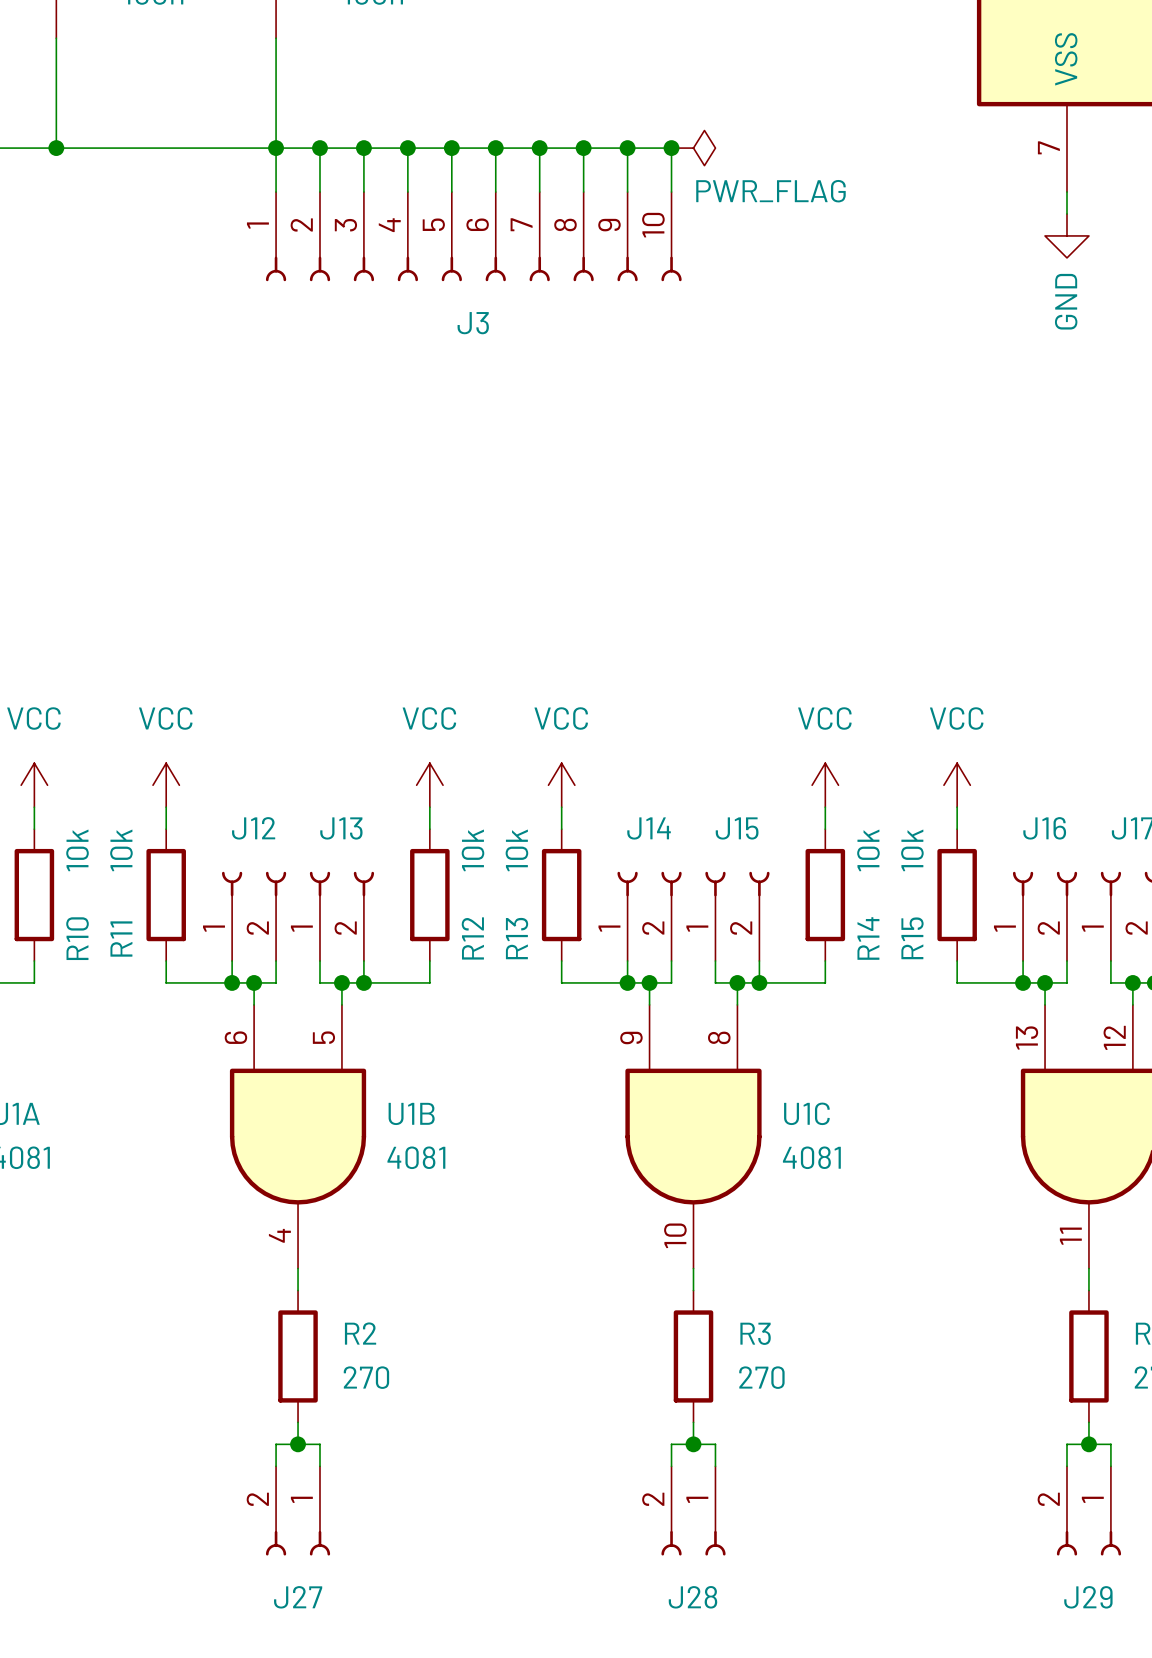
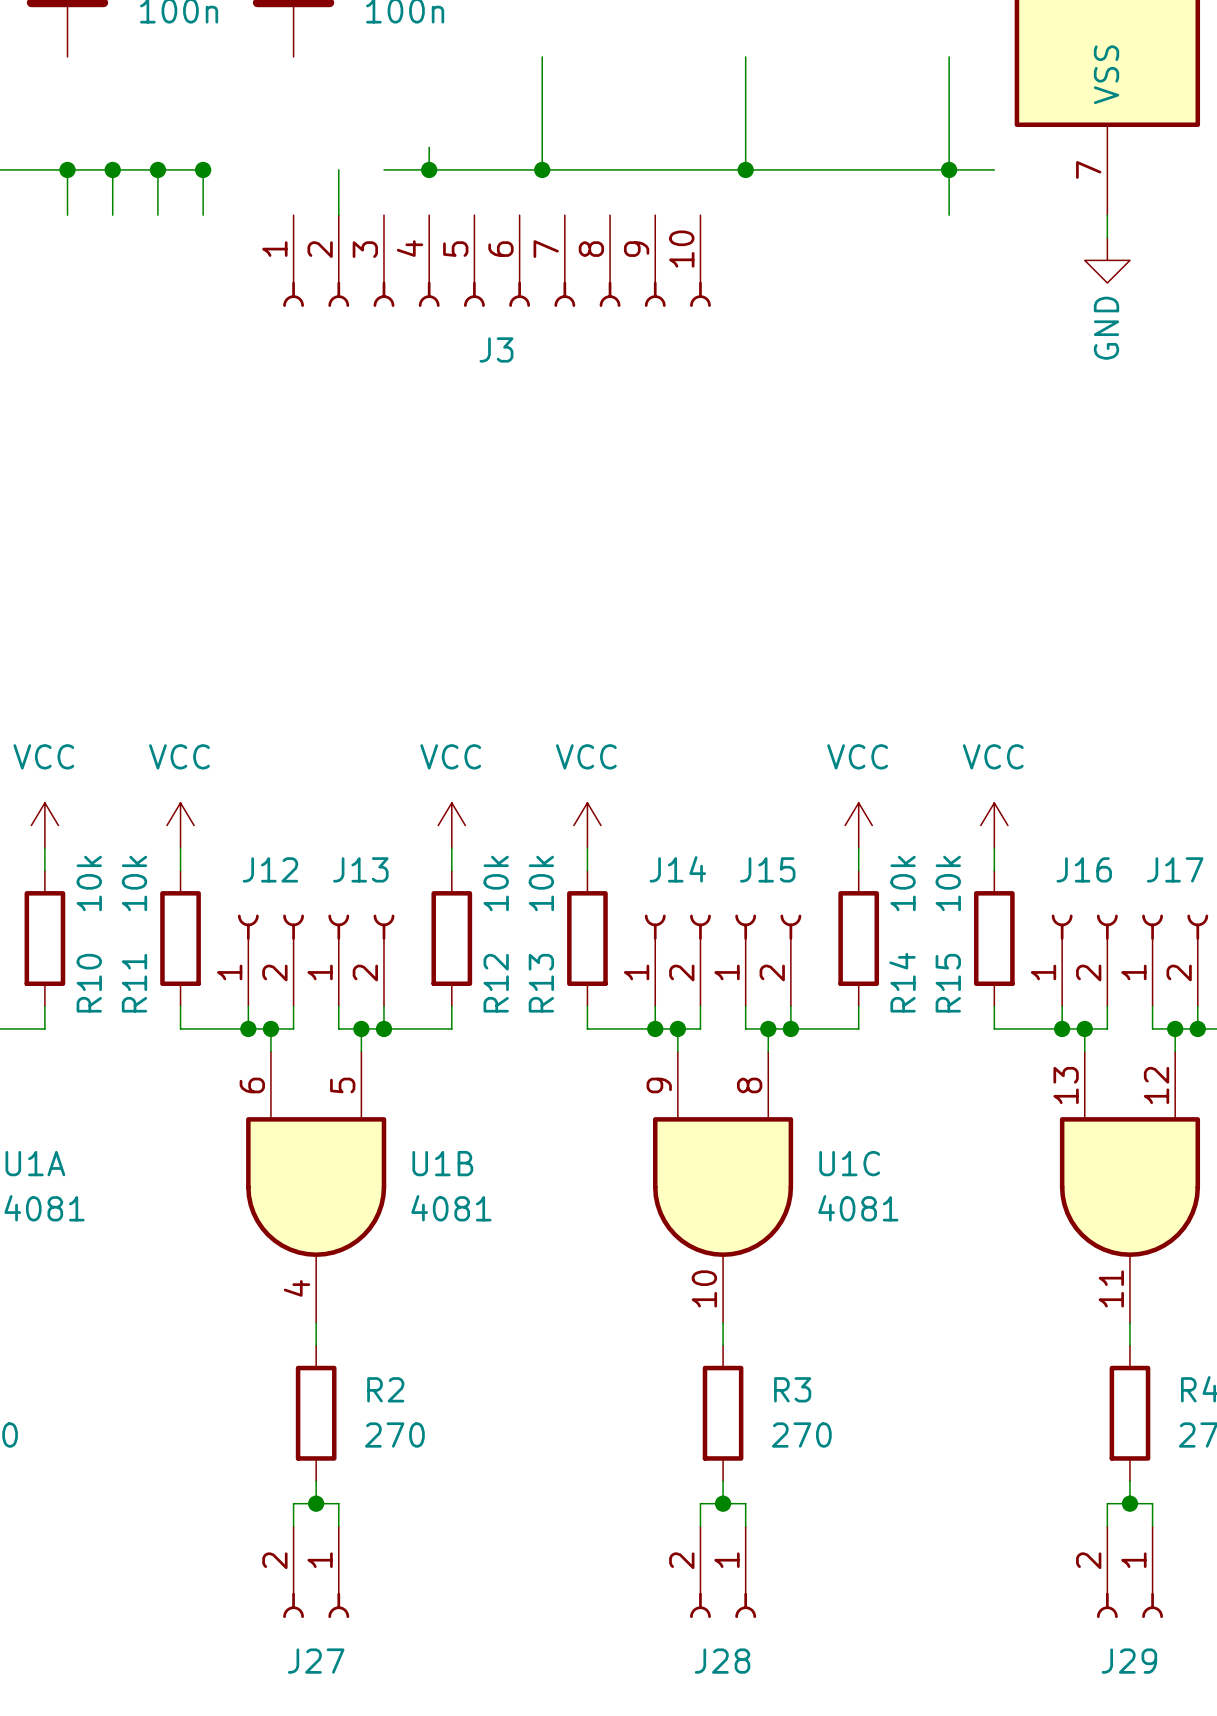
wire: (56, 38) (56, 148) -> (67, 215) (67, 169)
wire: (276, 38) (276, 192) -> none
wire: none -> (542, 56) (542, 169)
wire: none -> (745, 56) (745, 169)
wire: none -> (949, 56) (949, 215)
junction: none -> (112, 169)
junction: none -> (157, 169)
wire: (188, 148) (363, 148) (363, 192) -> (203, 169) (203, 215)
junction: none -> (203, 169)
junction: (276, 148) -> none
junction: (319, 148) -> none
junction: (363, 148) -> none
wire: (407, 148) (407, 192) -> (429, 169) (429, 147)
wire: (451, 148) (451, 192) -> none
junction: (451, 148) -> none
wire: (495, 148) (495, 192) -> (112, 169) (112, 215)
junction: (495, 148) -> none
junction: none -> (542, 169)
wire: (539, 148) (539, 192) -> (157, 169) (157, 215)
junction: (539, 148) -> none
wire: (583, 148) (583, 192) -> none
junction: (583, 148) -> none
wire: (627, 148) (627, 192) -> none
junction: (627, 148) -> none
wire: (671, 148) (671, 192) -> (700, 169) (994, 169)
junction: (671, 148) -> none
power symbol: PWR_FLAG (693, 148) -> none
junction: none -> (745, 169)
junction: none -> (949, 169)

